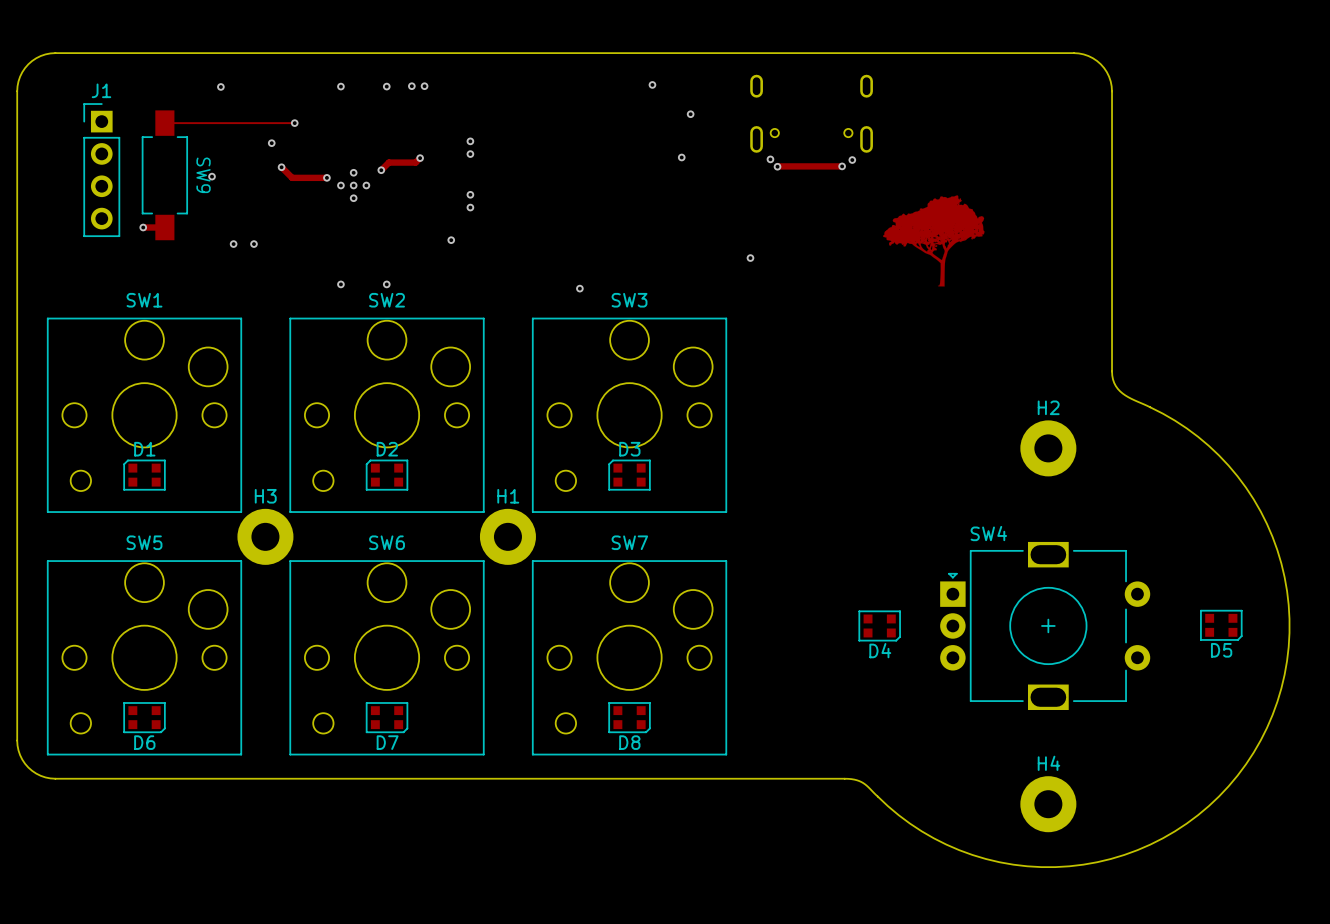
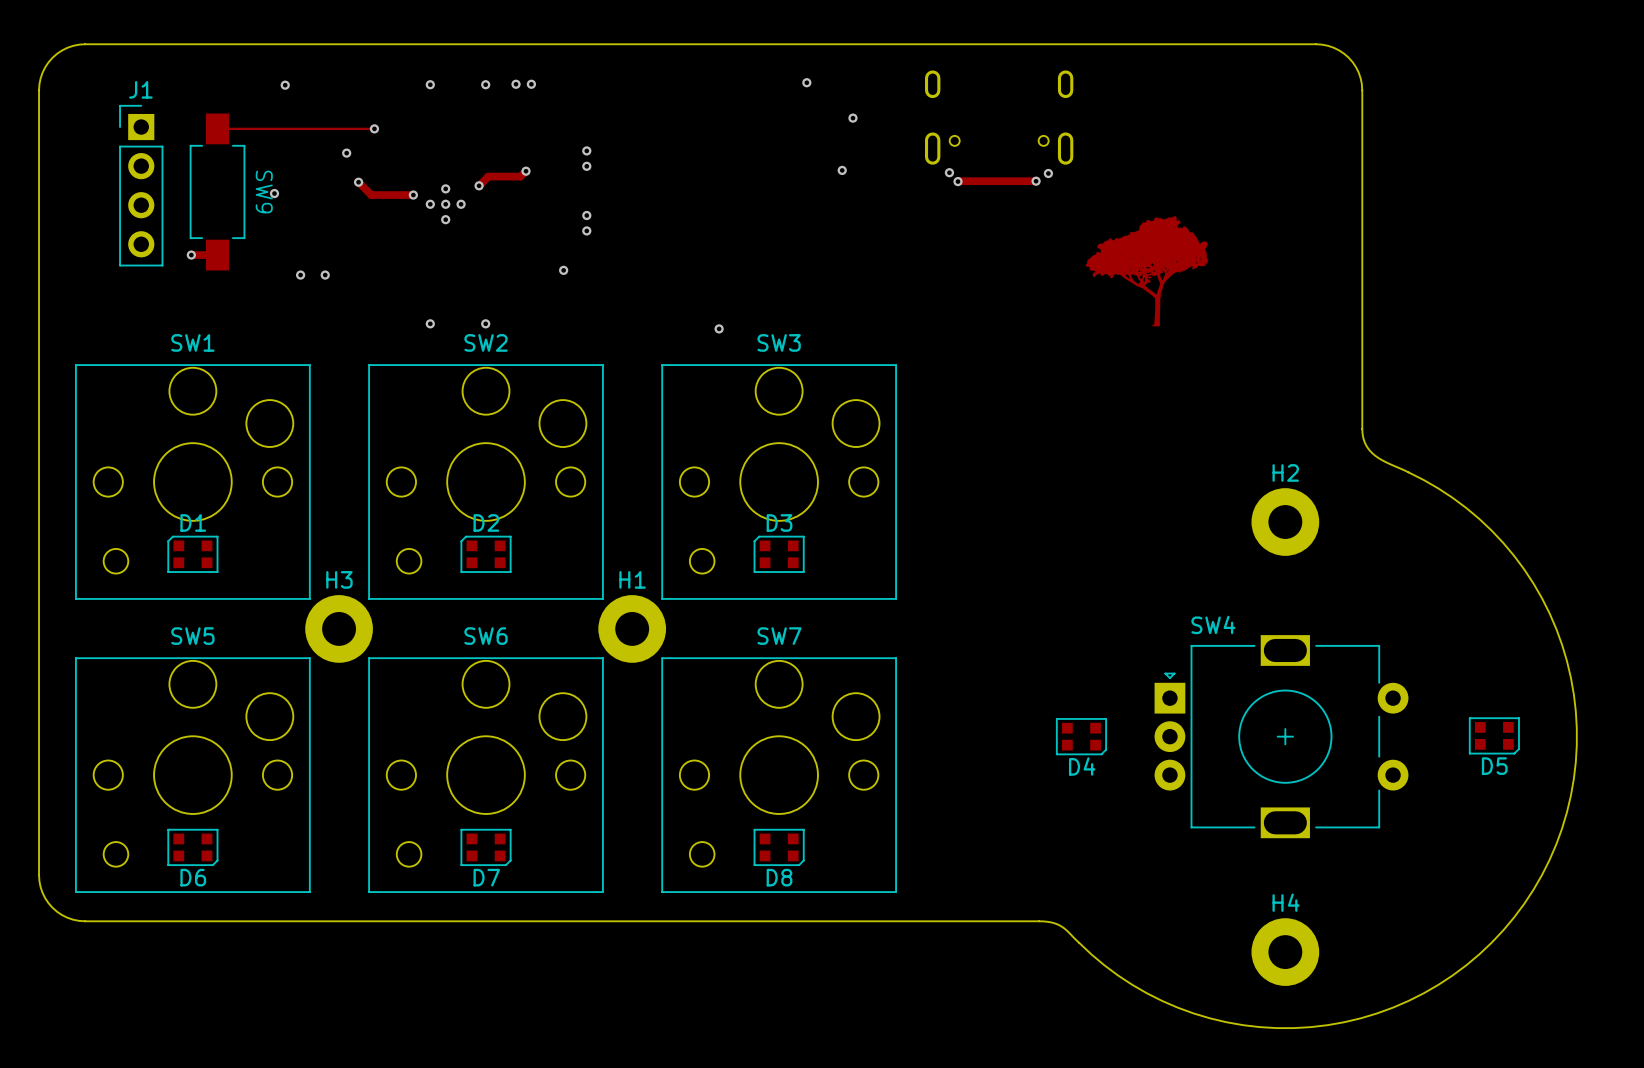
via: (750, 258) -> none

